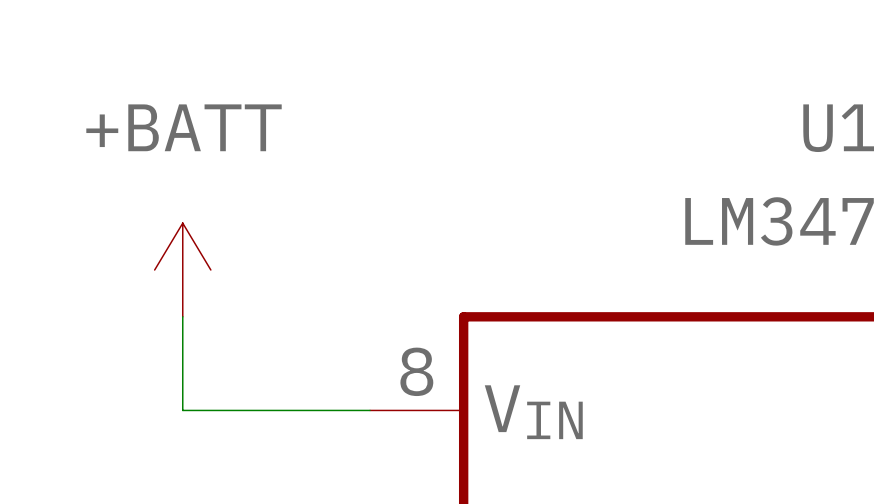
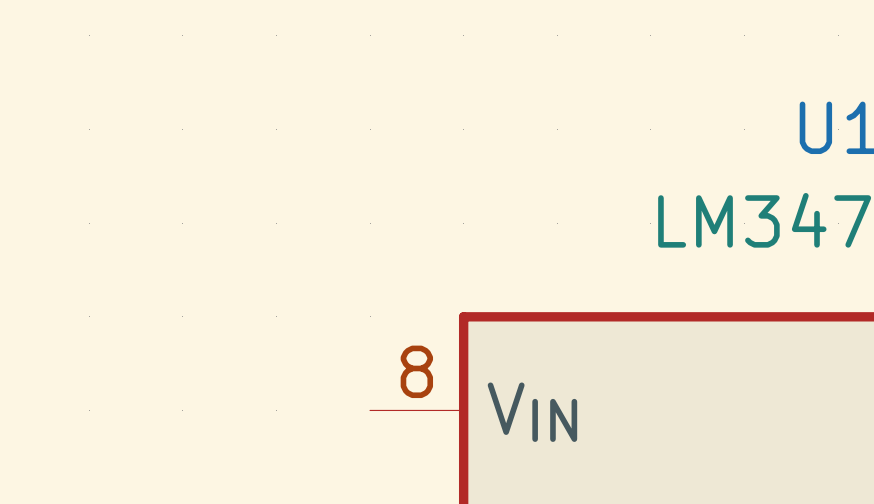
power symbol: +BATT (182, 270) -> none
wire: (182, 316) (182, 410) (370, 410) -> none

